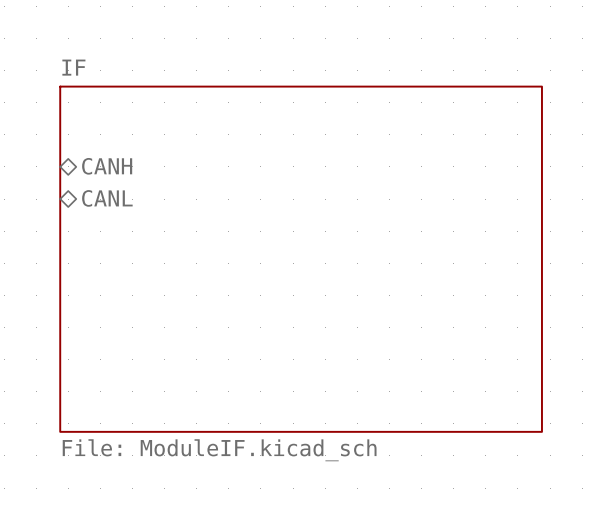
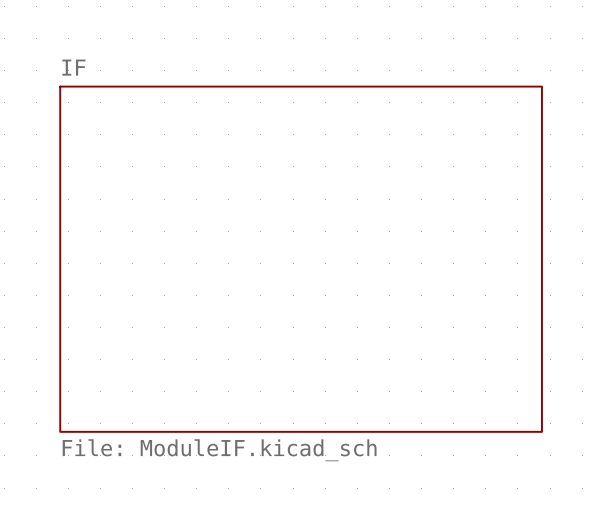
sheet pin: CANH (107, 166) -> none
sheet pin: CANL (107, 198) -> none

